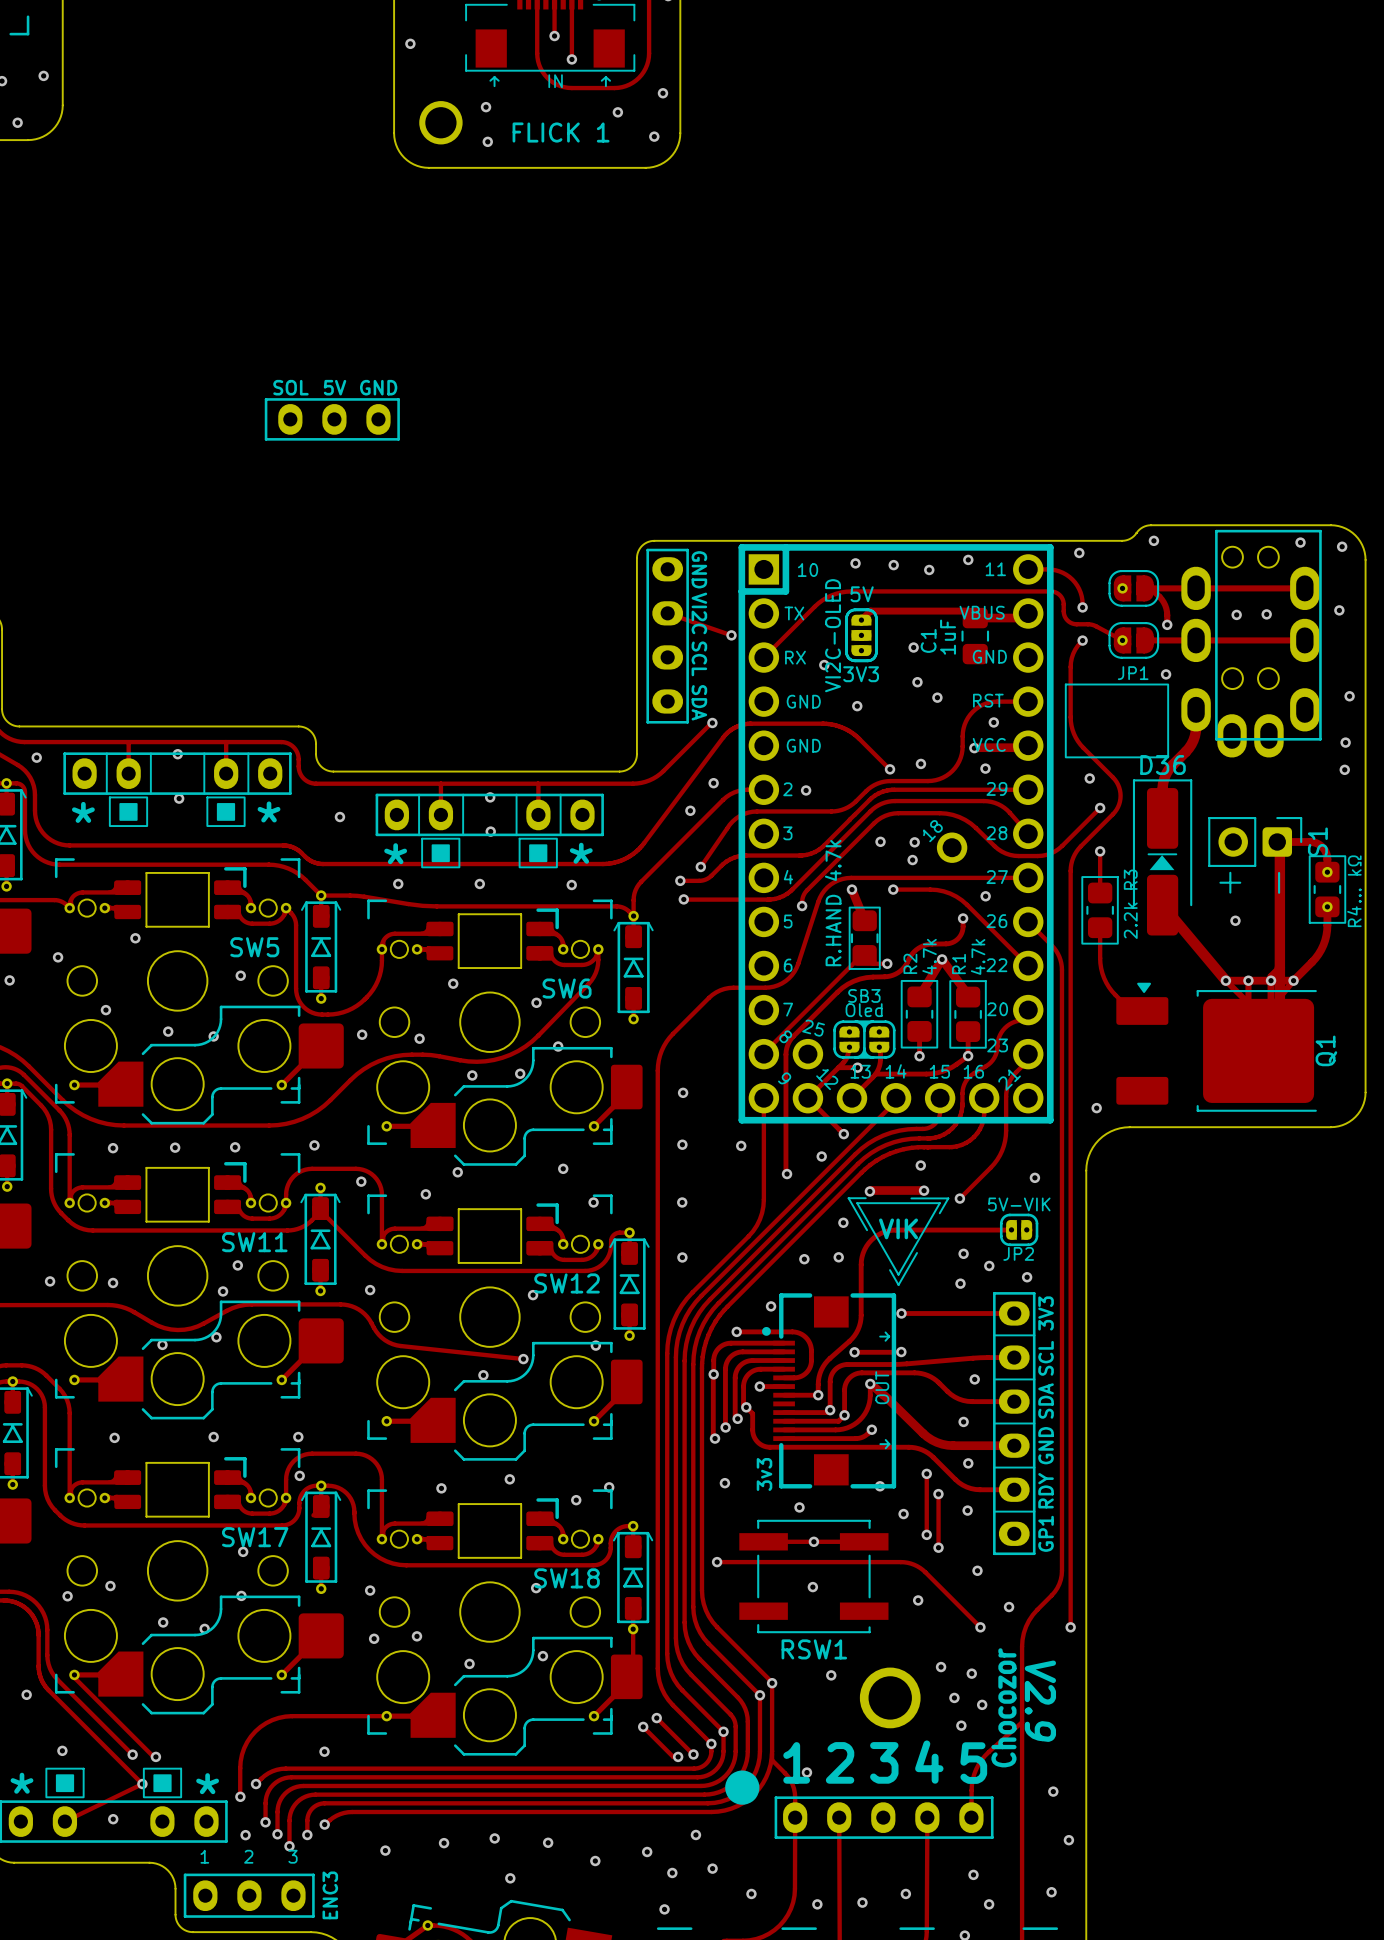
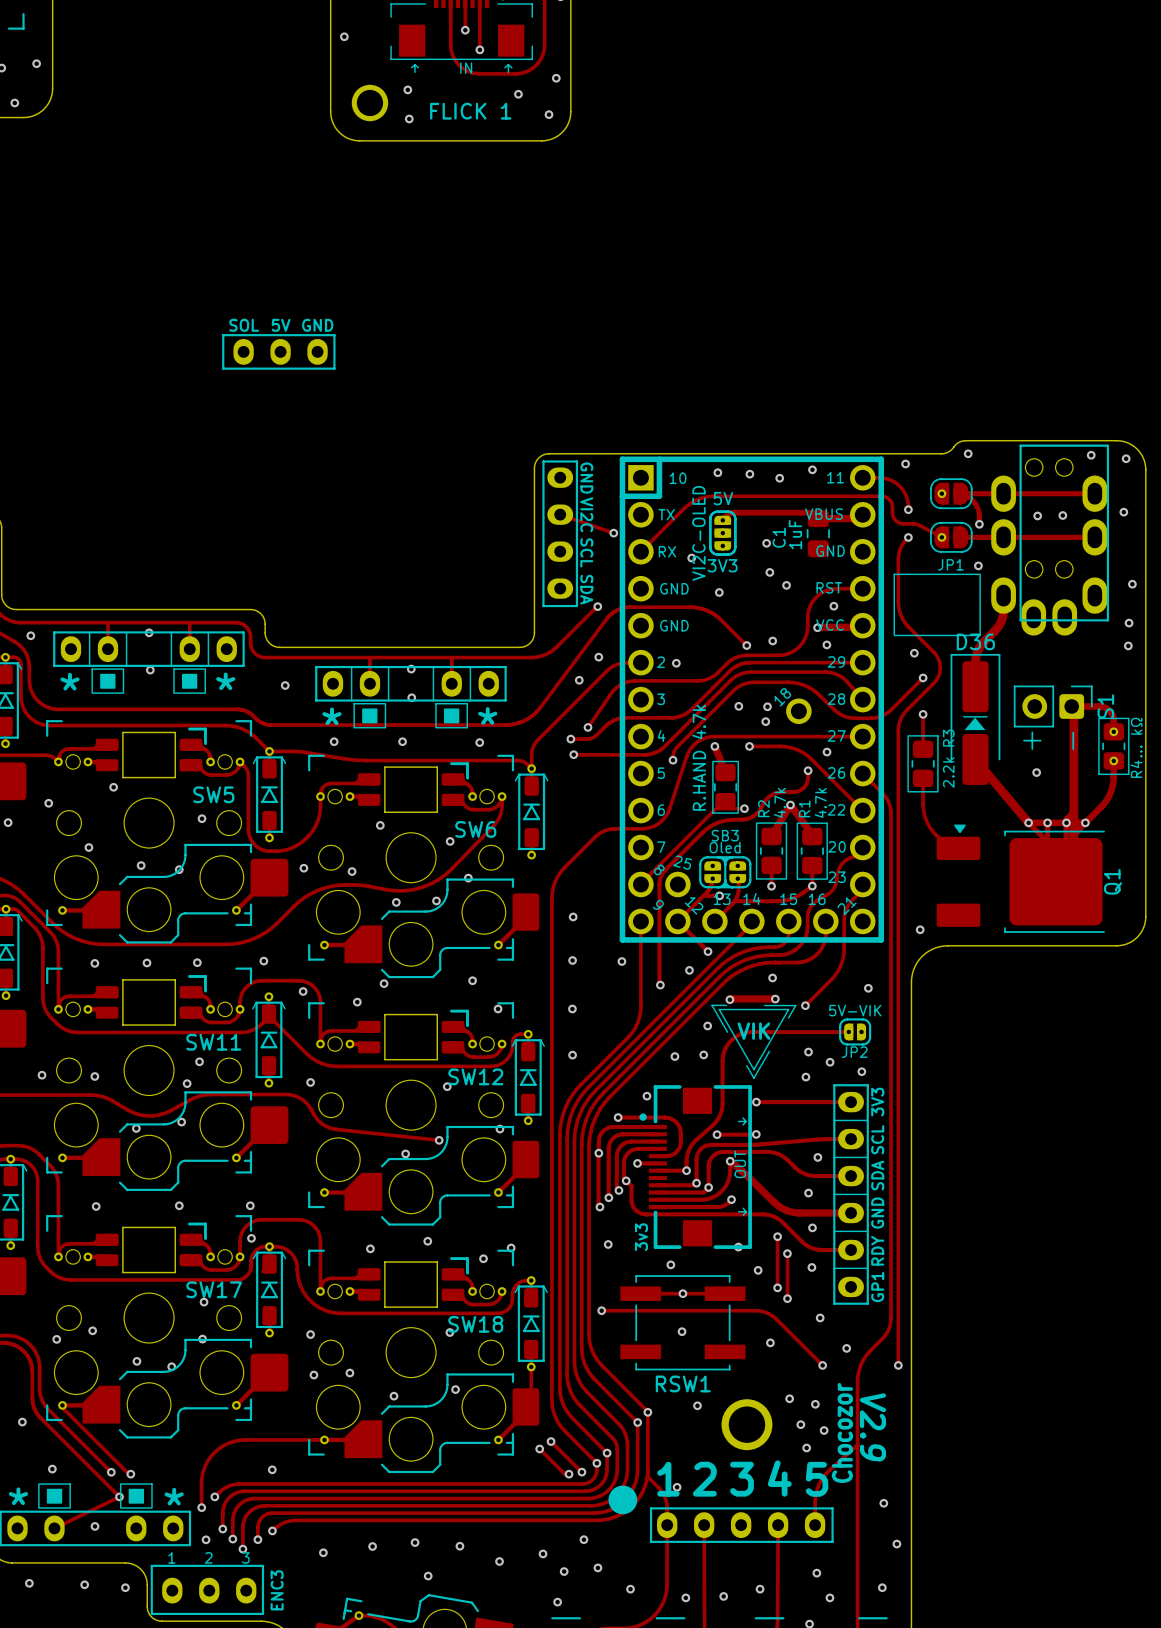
ENC3 footprint: [183, 1873, 315, 1918] -> [150, 1564, 265, 1616]
via: none -> (29, 1583)
via: none -> (84, 1584)
via: none -> (125, 1587)

